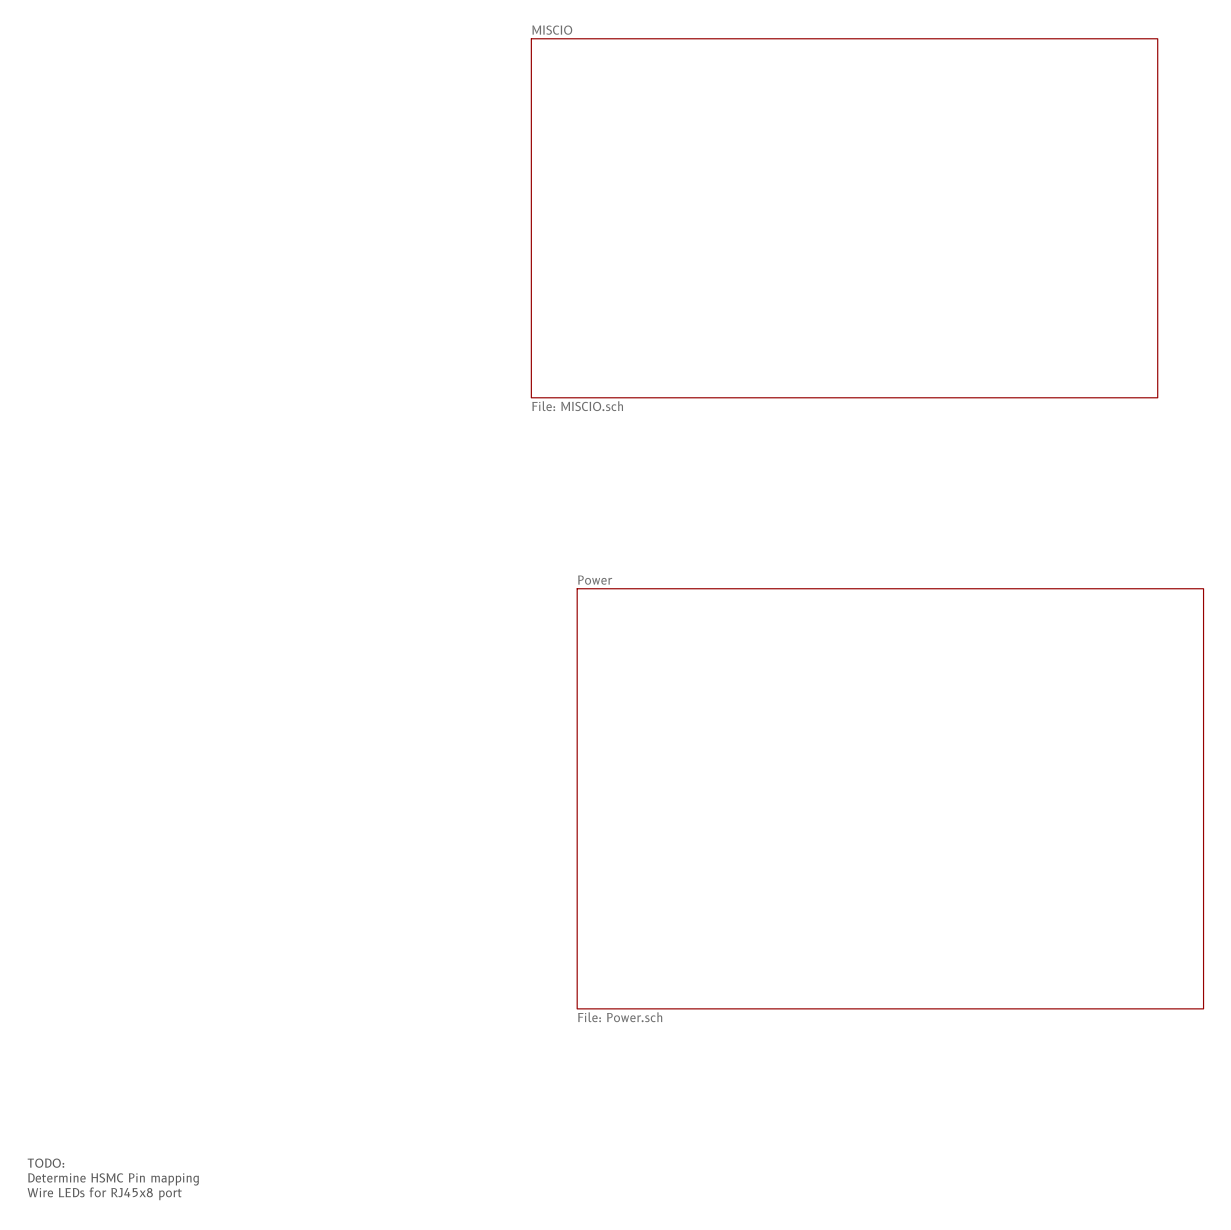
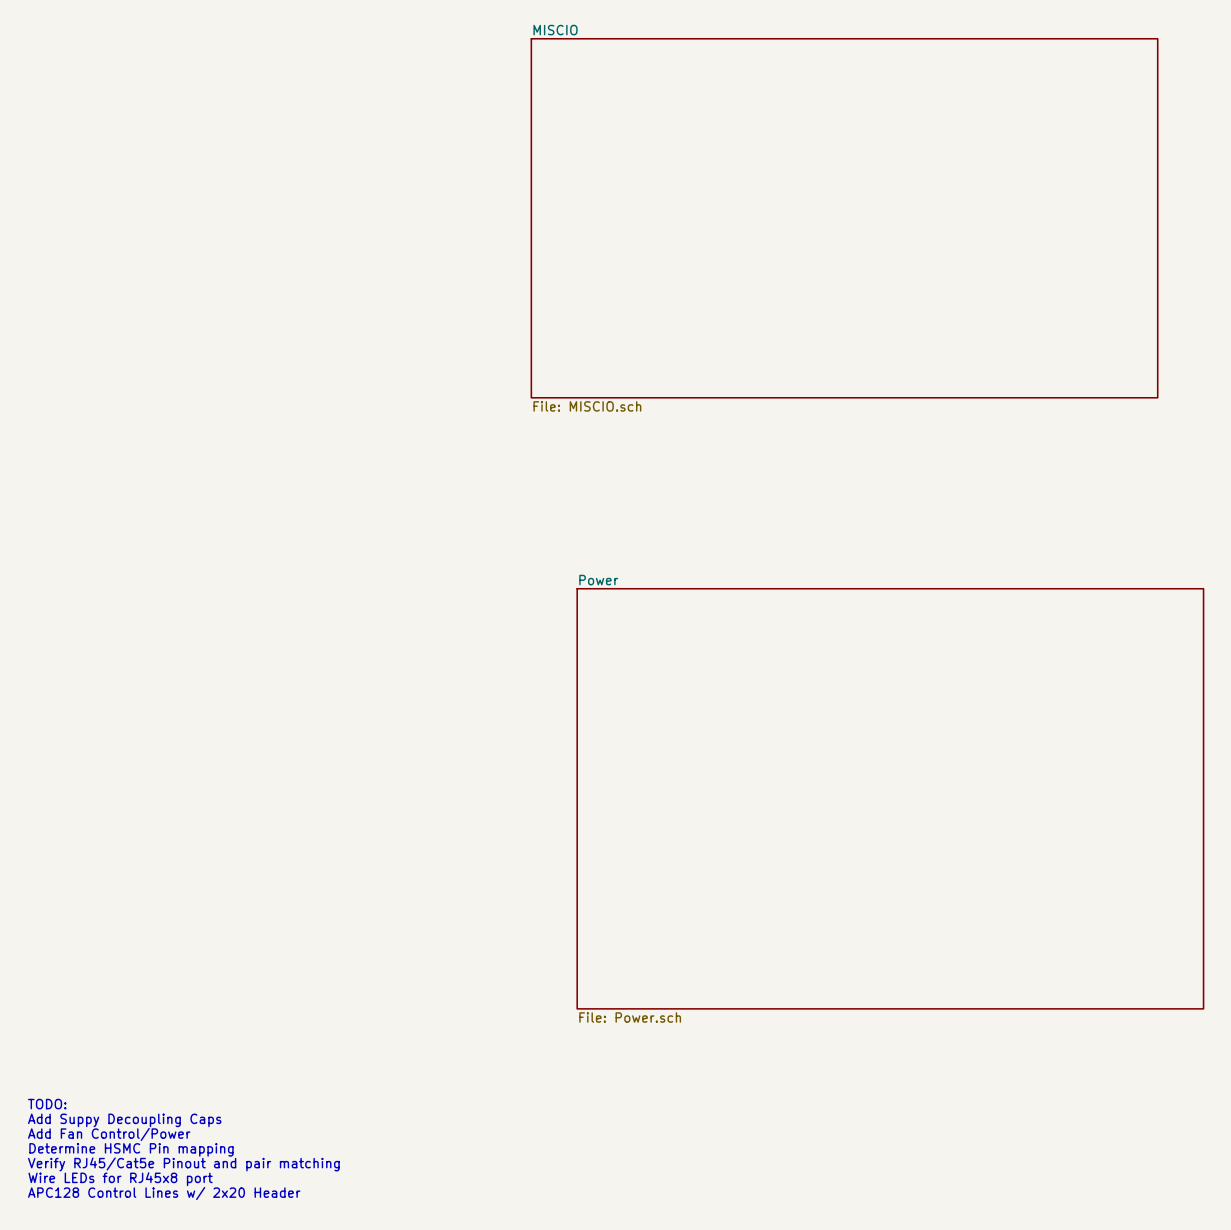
text: none -> TODO: (47, 1104)
text: none -> Add Suppy Decoupling Caps (124, 1120)
text: none -> Add Fan Control/Power (109, 1134)
text: none -> Determine HSMC Pin mapping (131, 1149)
text: TODO: (45, 1163) -> Verify RJ45/Cat5e Pinout and pair matching (183, 1164)
text: Determine HSMC Pin mapping (113, 1179) -> Wire LEDs for RJ45x8 port (120, 1179)
text: Wire LEDs for RJ45x8 port (104, 1193) -> APC128 Control Lines w/ 2x20 Header (164, 1193)

